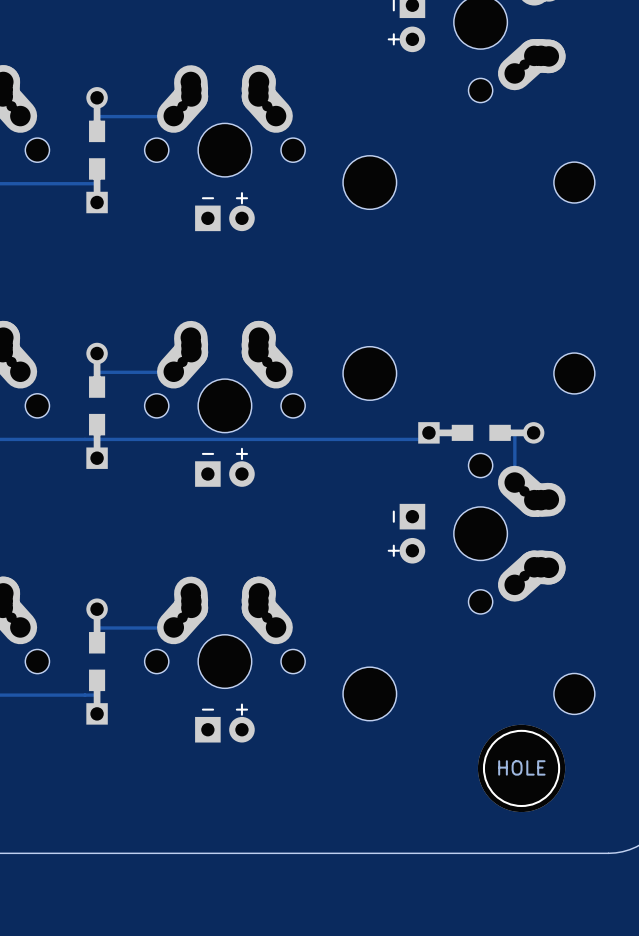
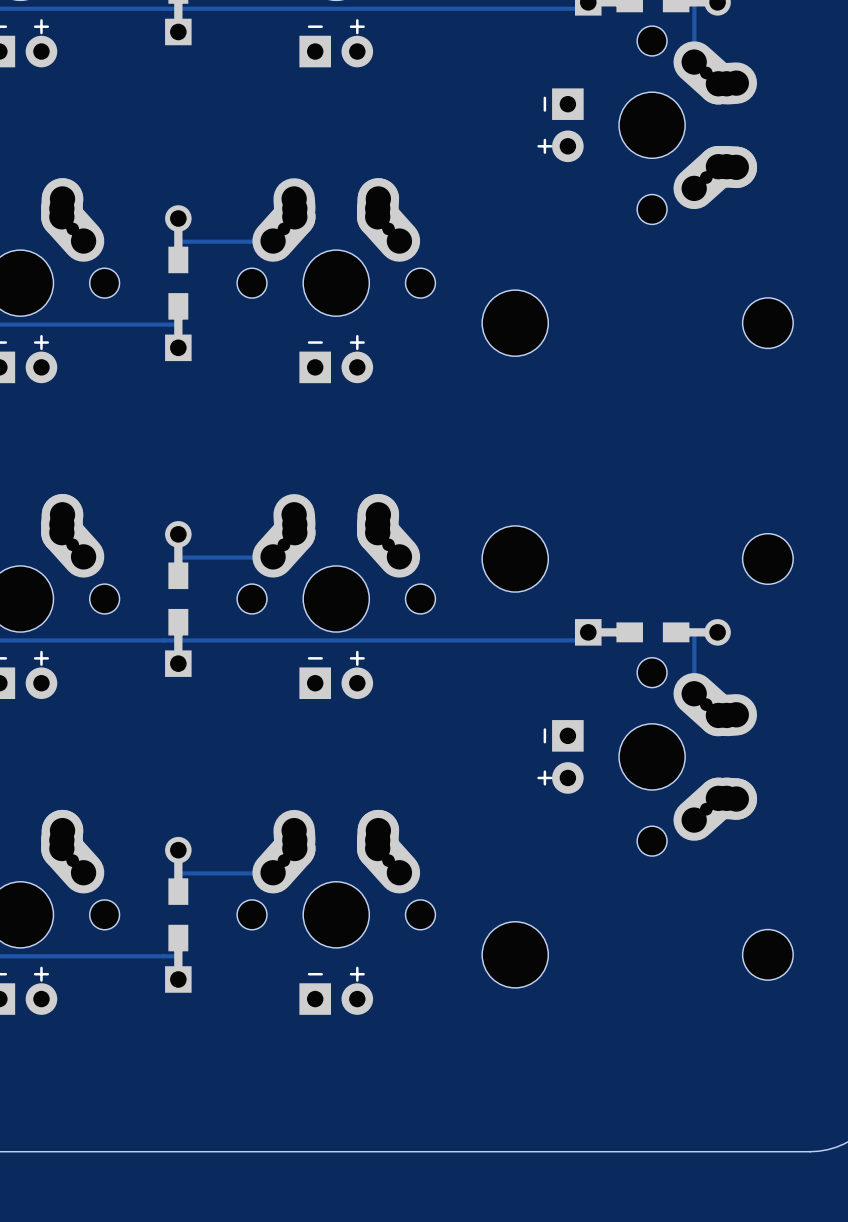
part: HOLE (521, 768) -> none

